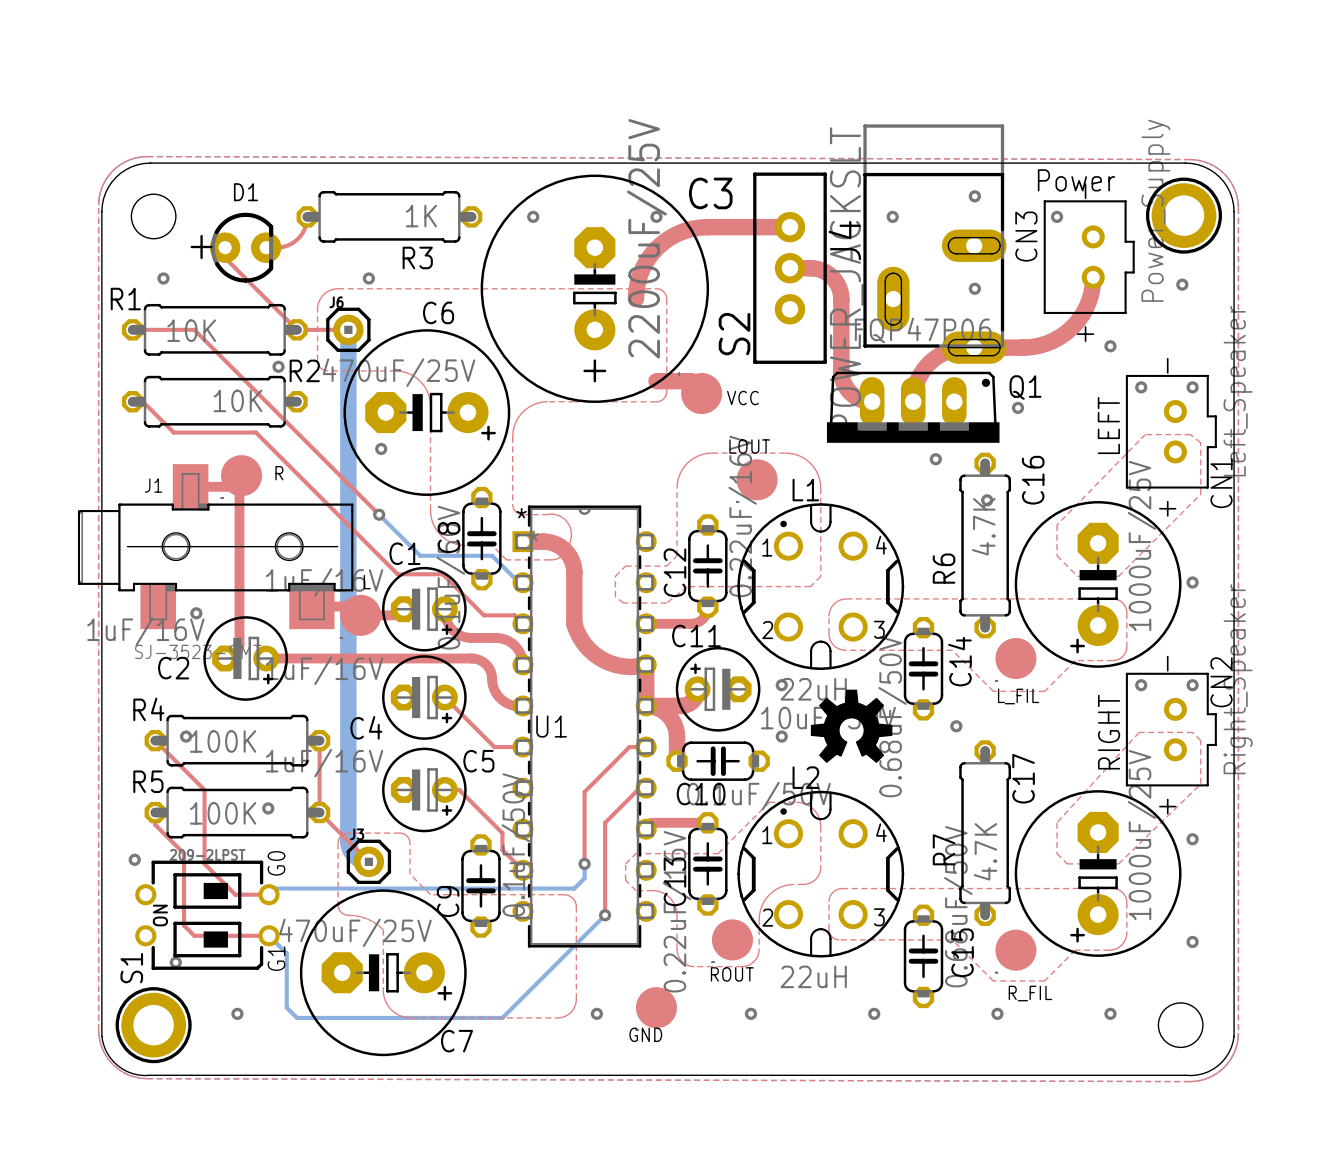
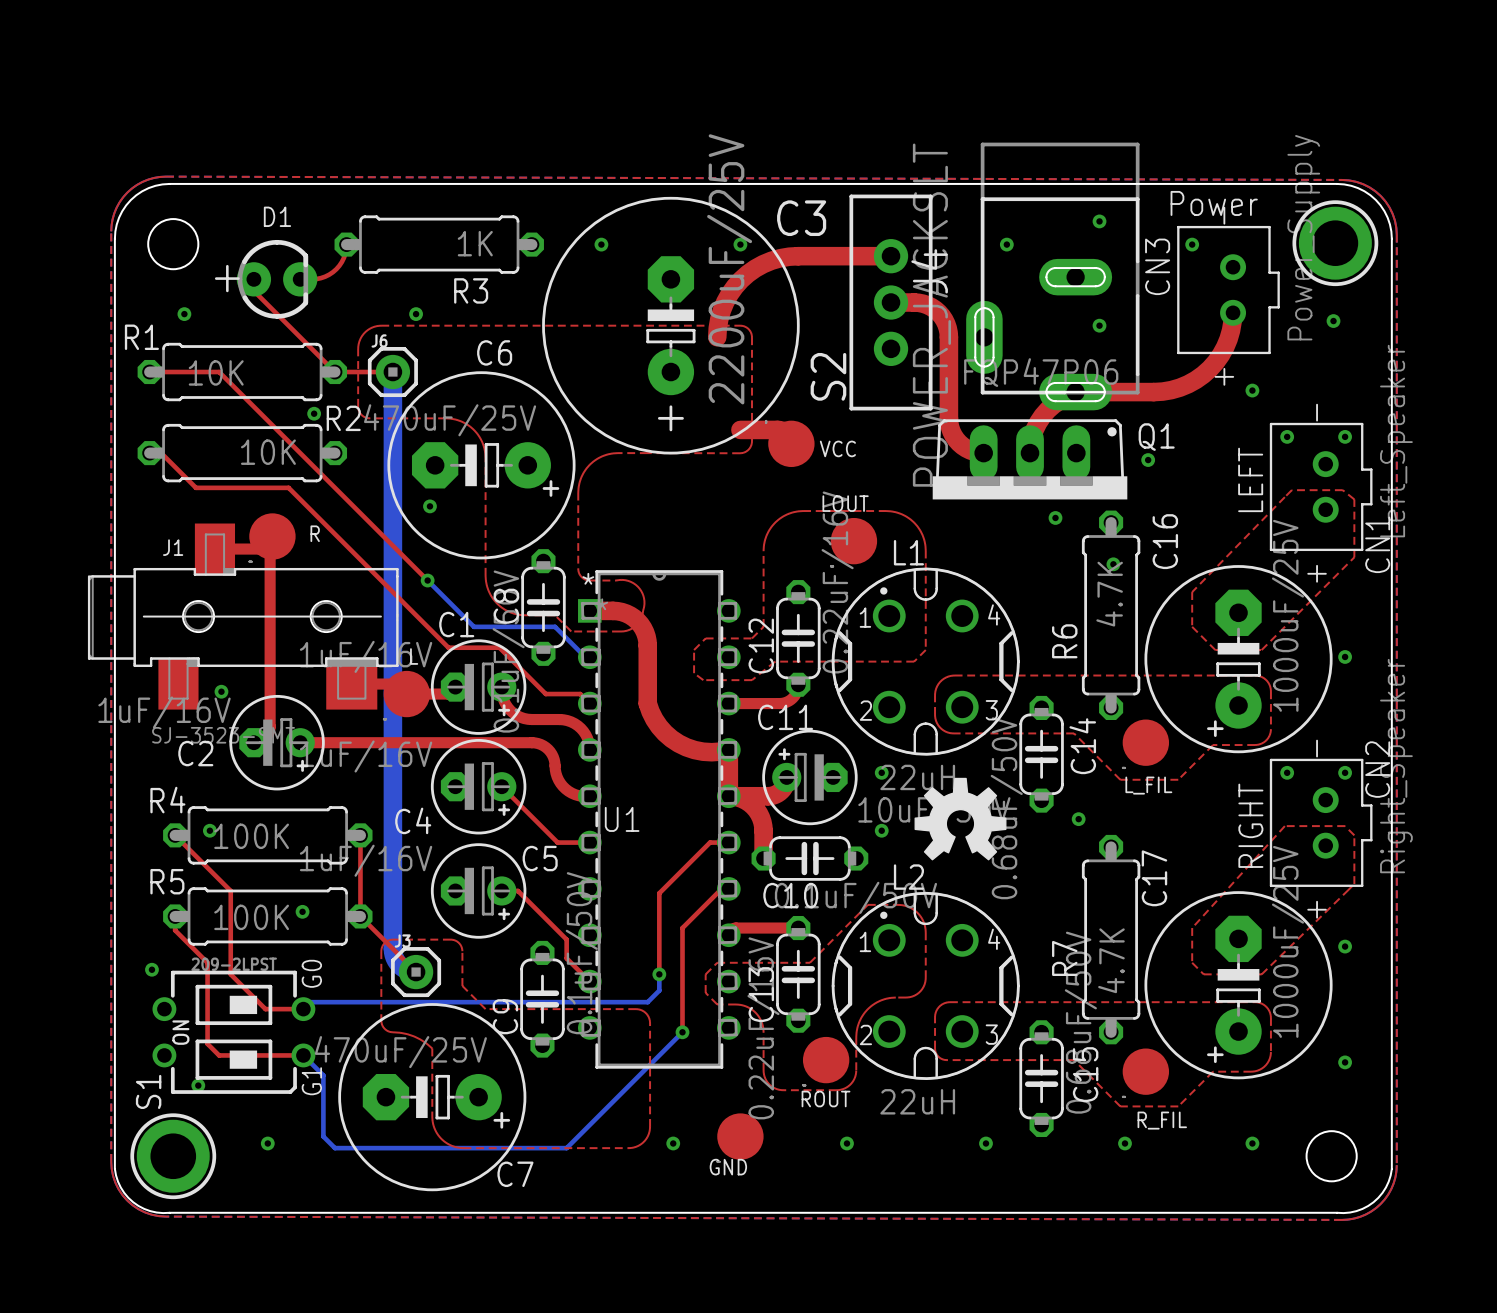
J4 footprint: [863, 124, 1007, 364] -> [966, 142, 1140, 411]

